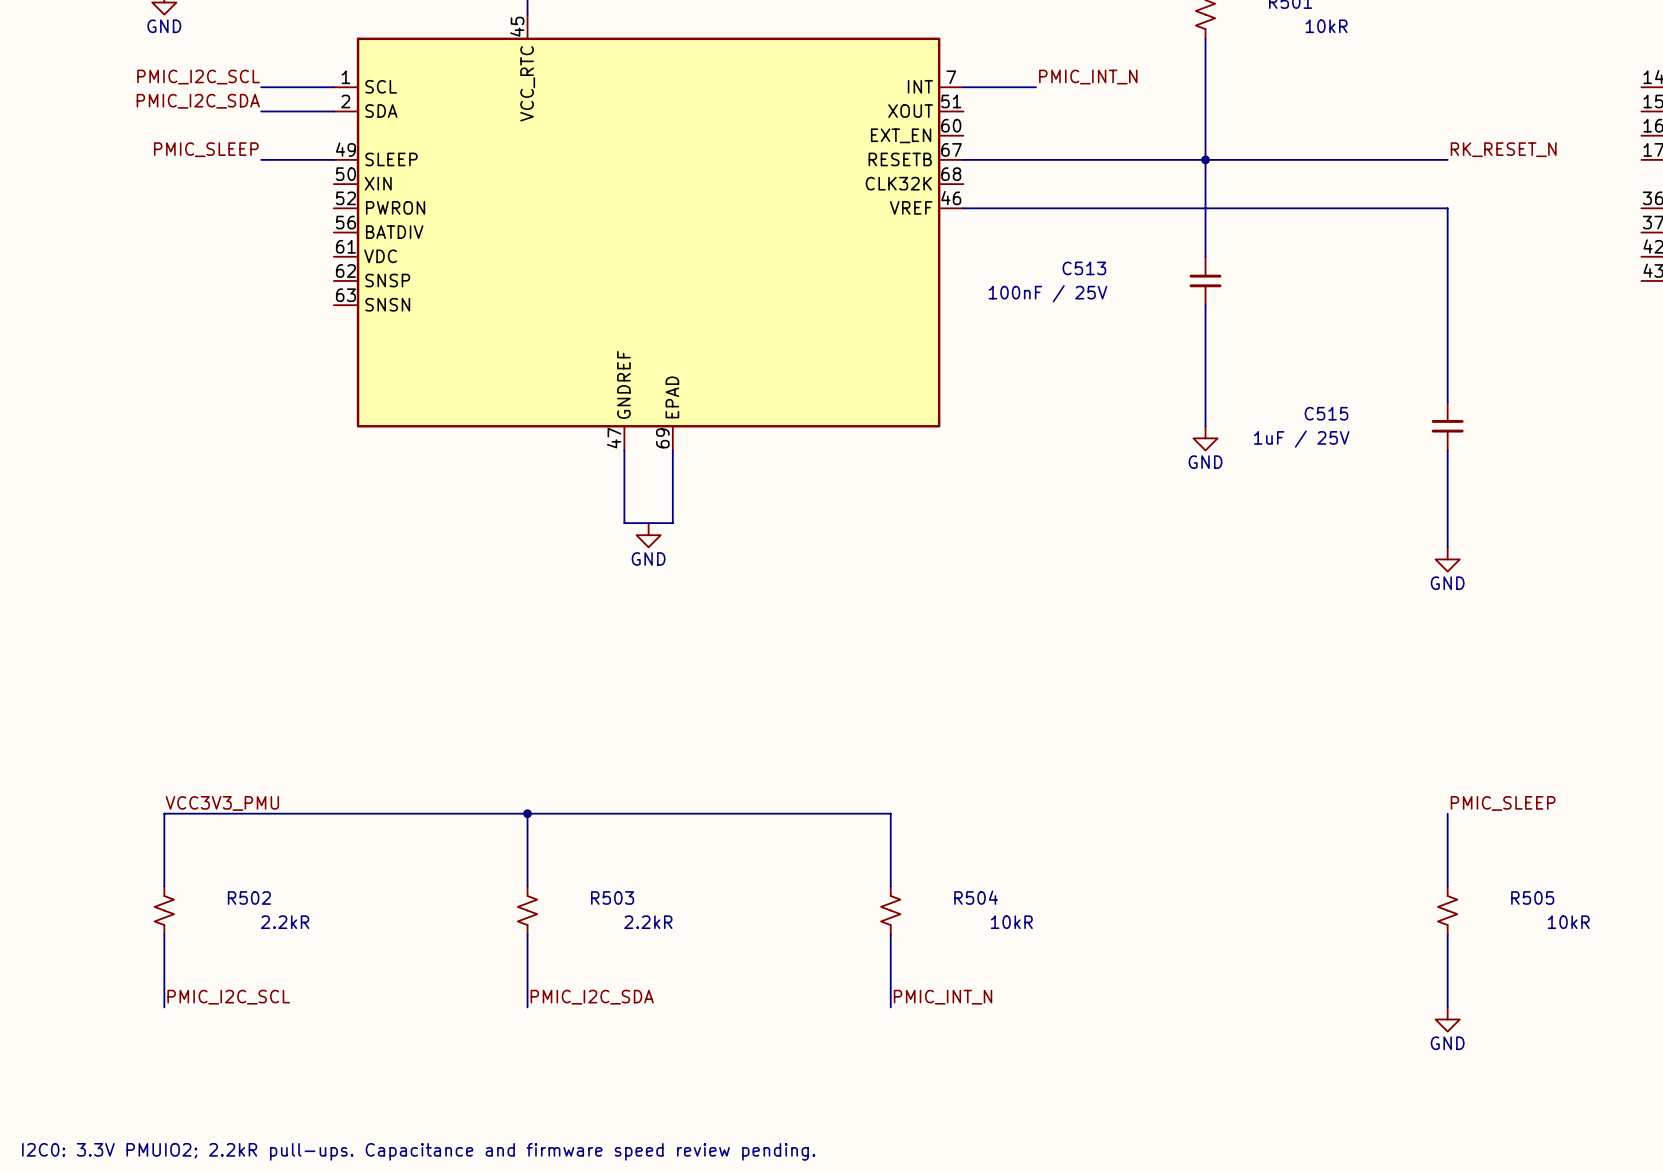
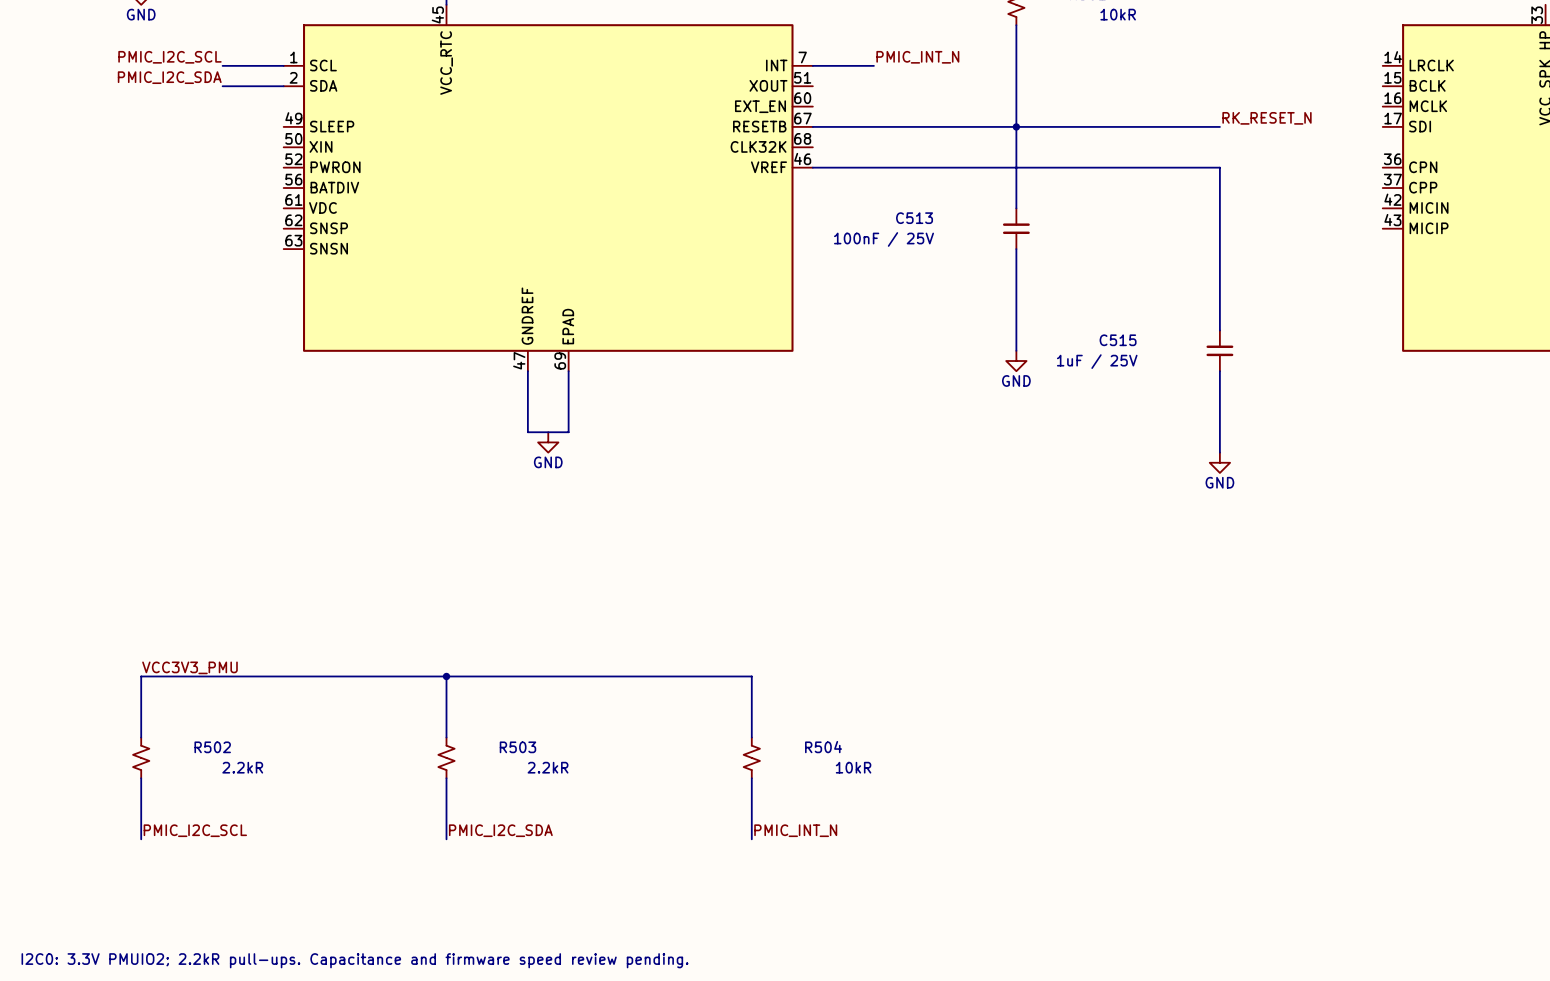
label: PMIC_SLEEP (206, 149) -> none
wire: (261, 159) (333, 159) -> none
label: PMIC_SLEEP (1503, 803) -> none
wire: (1447, 813) (1447, 886) -> none
R505: 10kR (1447, 910) -> none
wire: (1447, 934) (1447, 1007) -> none
power symbol: GND (1447, 1019) -> none

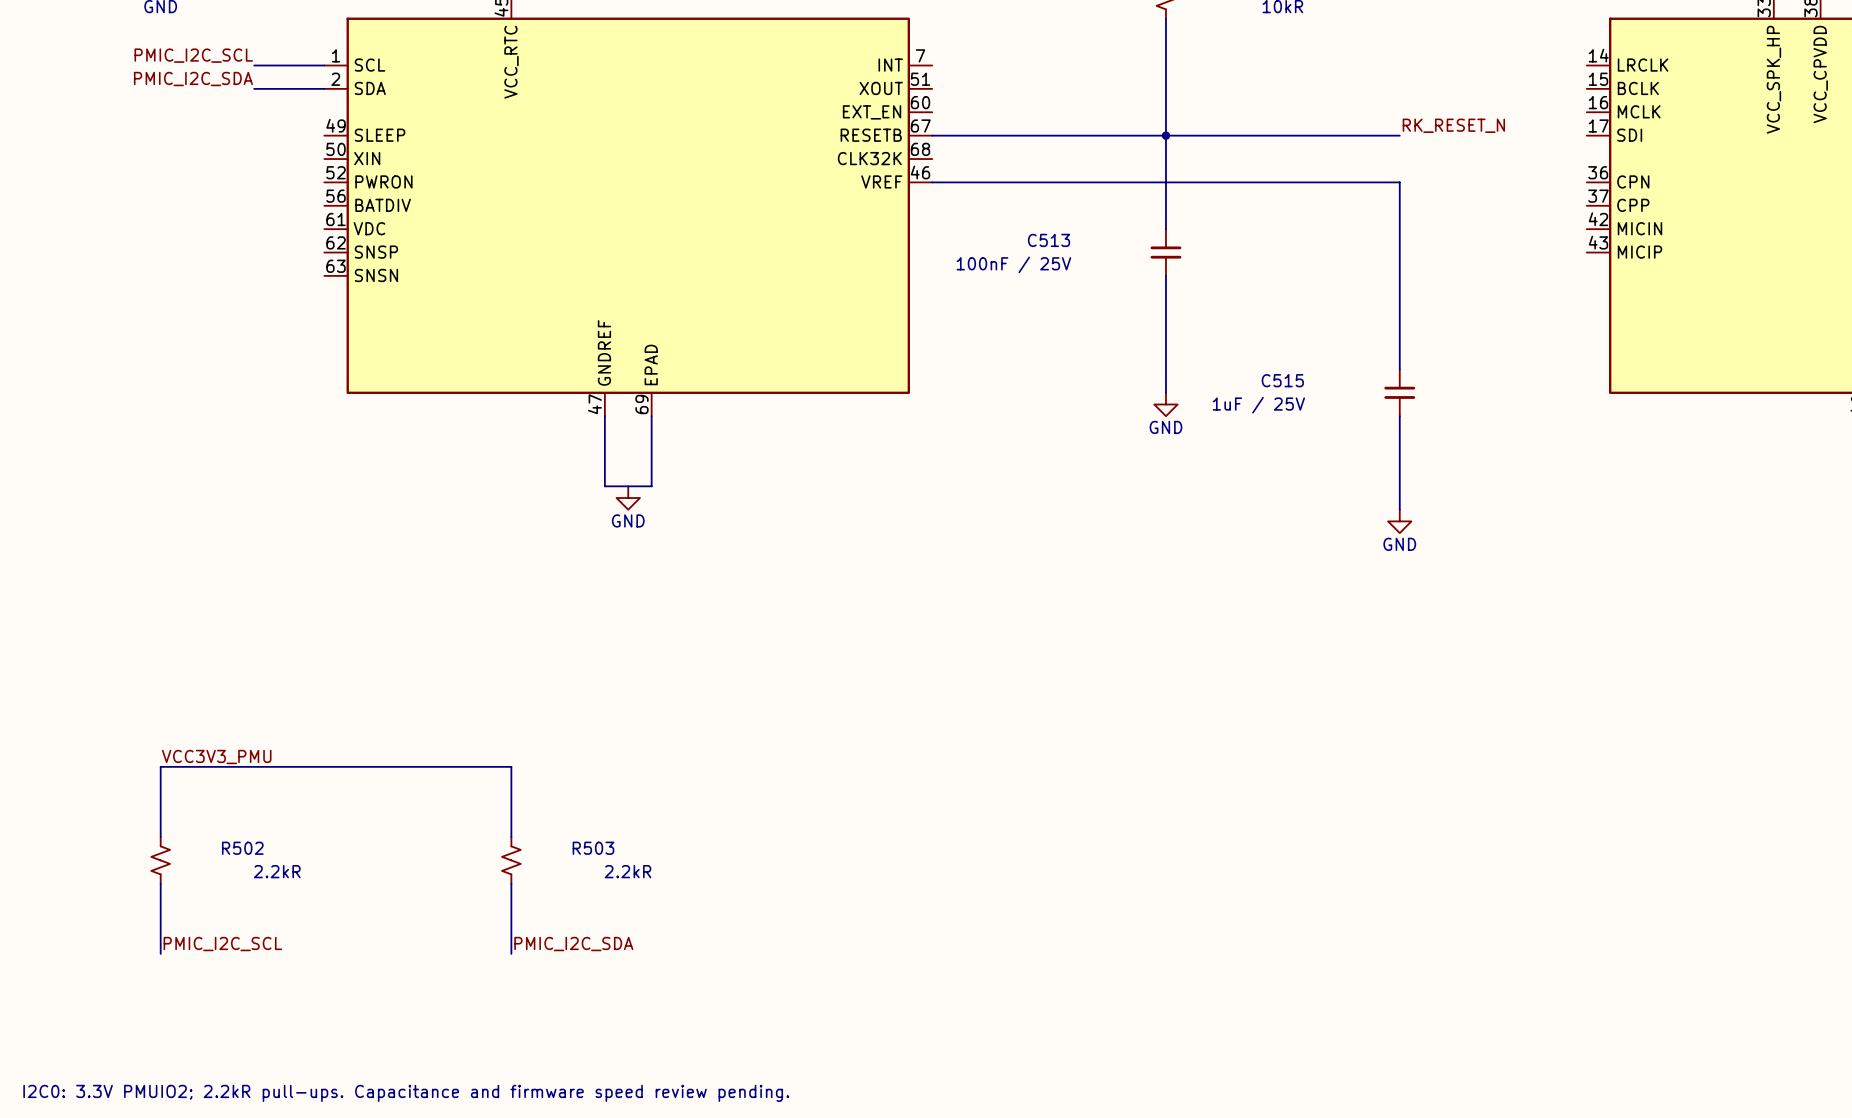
label: PMIC_INT_N (917, 57) -> none
wire: (812, 65) (873, 65) -> none
wire: (446, 676) (751, 676) (751, 737) -> none
junction: (446, 676) -> none
R504: 10kR (751, 757) -> none
wire: (751, 778) (751, 839) -> none
label: PMIC_INT_N (795, 830) -> none

